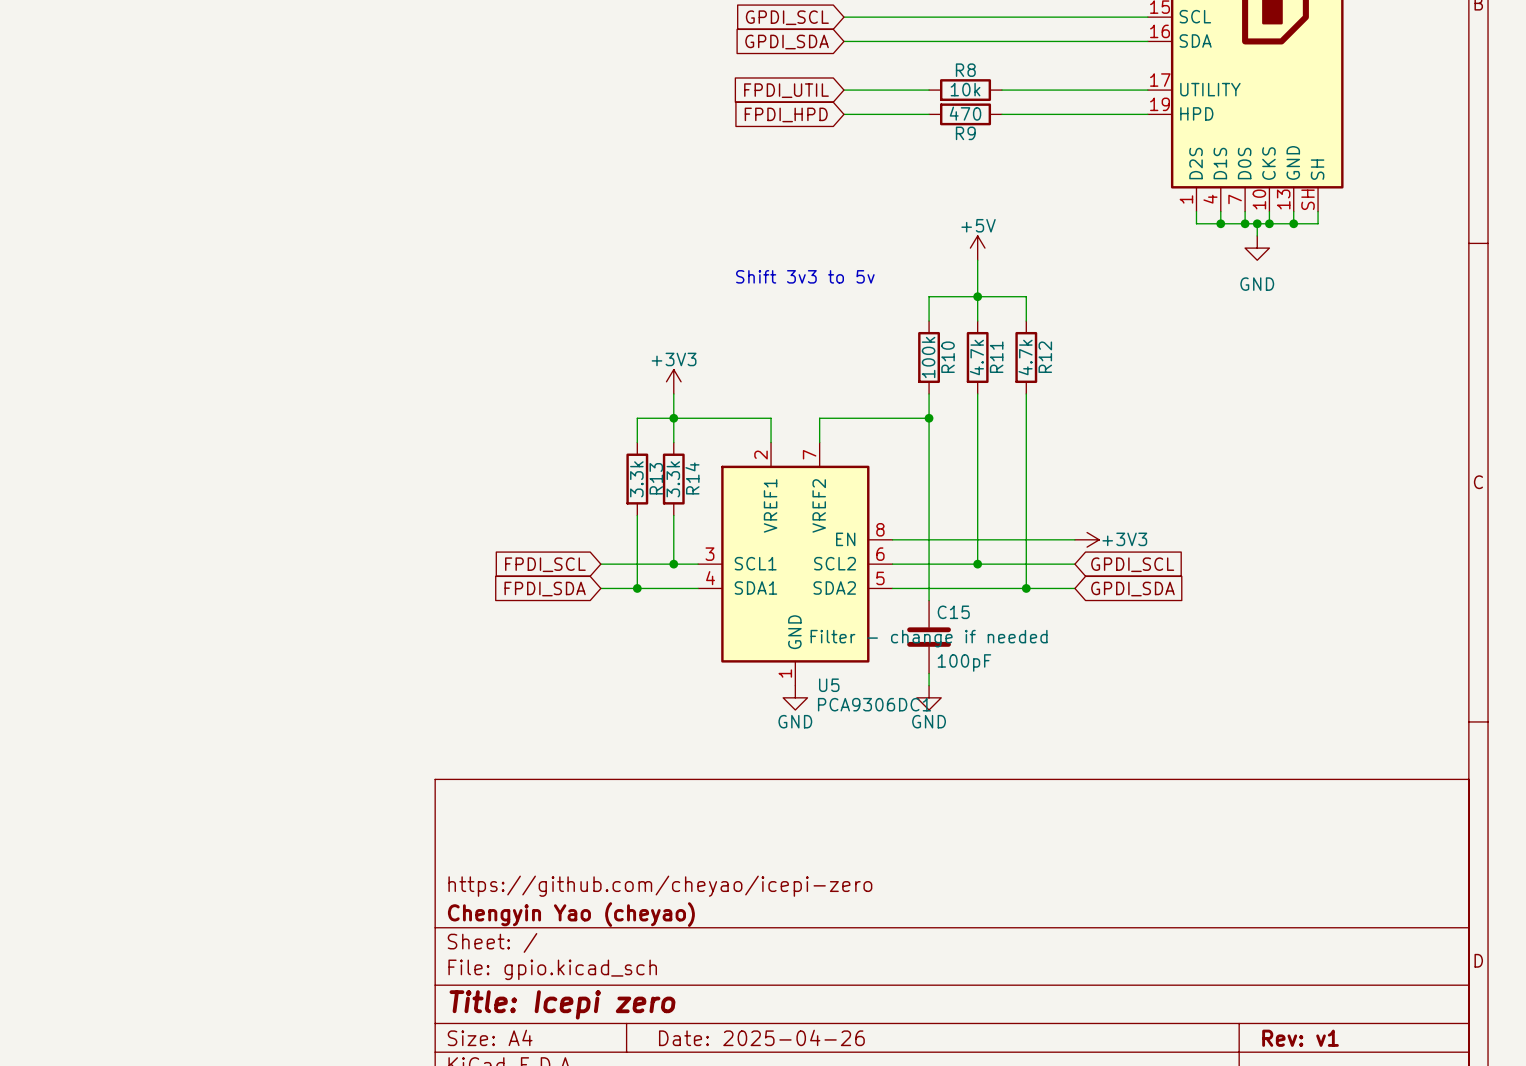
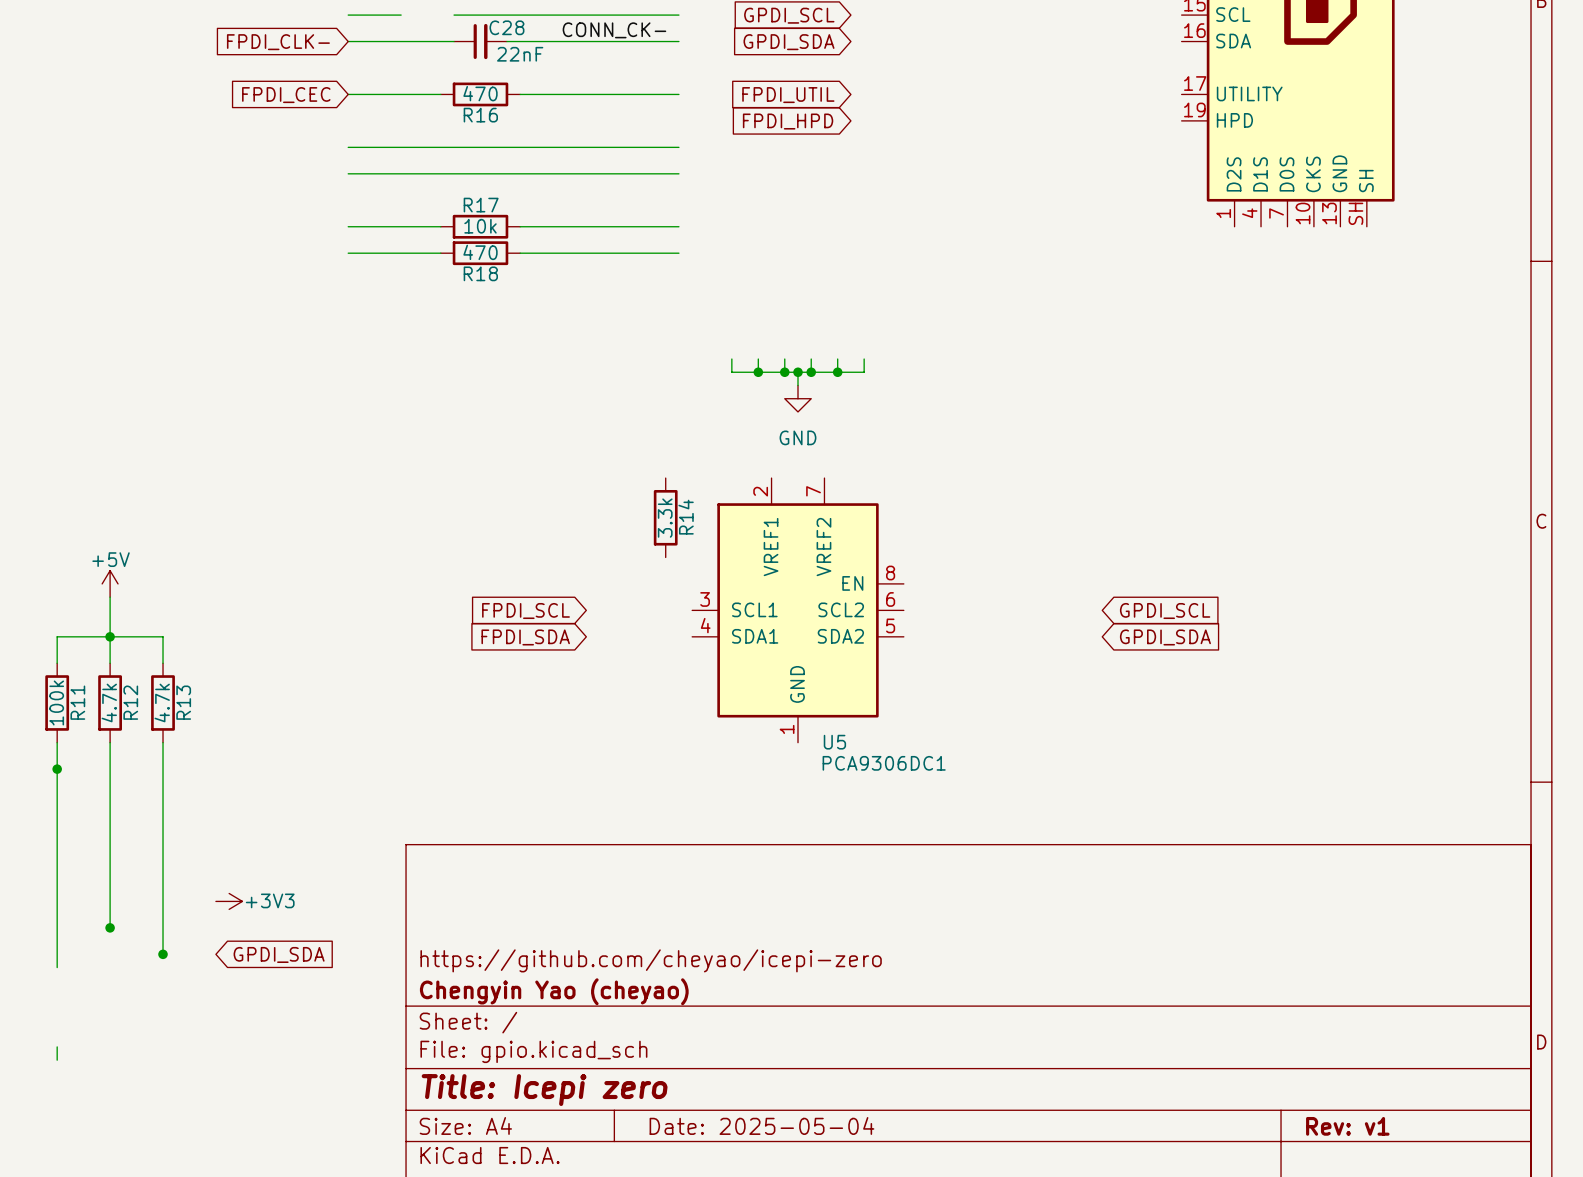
wire: none -> (348, 15) (401, 15)
wire: none -> (454, 15) (678, 15)
wire: (843, 17) (1147, 17) -> none
label: none -> CONN_CK- (614, 30)
wire: none -> (348, 41) (454, 41)
C28: none -> 22nF (480, 41)
wire: none -> (506, 41) (678, 41)
wire: (843, 41) (1147, 41) -> none
global label: none -> FPDI_CLK- (278, 42)
global label: none -> FPDI_CEC (286, 95)
wire: none -> (348, 94) (440, 94)
R16: none -> 470 (480, 94)
wire: none -> (520, 94) (678, 94)
wire: (843, 90) (929, 90) -> none
R8: 10k (965, 90) -> none
wire: (1001, 90) (1147, 90) -> none
wire: (843, 114) (929, 114) -> none
R9: 470 (965, 114) -> none
wire: (1001, 114) (1147, 114) -> none
wire: none -> (348, 147) (678, 147)
wire: none -> (348, 173) (678, 173)
wire: none -> (348, 226) (440, 226)
R17: none -> 10k (480, 226)
wire: none -> (520, 226) (678, 226)
wire: (1196, 211) (1196, 223) (1318, 223) (1318, 211) -> none
wire: (1220, 211) (1220, 223) -> none
wire: (1245, 211) (1245, 223) -> none
wire: (1269, 211) (1269, 223) -> none
wire: (1293, 211) (1293, 223) -> none
junction: (1220, 223) -> none
junction: (1245, 223) -> none
wire: (1257, 223) (1257, 235) -> none
junction: (1257, 223) -> none
junction: (1269, 223) -> none
junction: (1293, 223) -> none
wire: none -> (348, 253) (440, 253)
R18: none -> 470 (480, 253)
wire: none -> (520, 253) (678, 253)
power symbol: +5V (977, 248) -> none
power symbol: GND (1257, 248) -> none
wire: (977, 260) (977, 321) -> none
text: Shift 3v3 to 5v (805, 276) -> none
junction: (977, 296) -> none
wire: (929, 321) (929, 296) (1026, 296) (1026, 321) -> none
wire: none -> (731, 359) (731, 372) (864, 372) (864, 359)
wire: none -> (758, 359) (758, 372)
wire: none -> (784, 359) (784, 372)
wire: none -> (811, 359) (811, 372)
wire: none -> (837, 359) (837, 372)
junction: none -> (758, 372)
junction: none -> (784, 372)
wire: none -> (798, 372) (798, 385)
junction: none -> (798, 372)
junction: none -> (811, 372)
junction: none -> (837, 372)
R10: 100k (929, 357) -> none
R11 value: 4.7k (976, 357) -> 100k (56, 702)
R11 position: (977, 357) -> (57, 702)
R12 position: (1026, 357) -> (110, 702)
power symbol: none -> GND (798, 398)
power symbol: +3V3 (673, 381) -> none
wire: (673, 393) (673, 442) -> none
wire: (929, 393) (929, 600) -> none
wire: (977, 393) (977, 564) -> none
wire: (1026, 393) (1026, 588) -> none
junction: (673, 418) -> none
wire: (929, 418) (819, 418) (819, 442) -> none
junction: (929, 418) -> none
wire: (637, 442) (637, 418) (771, 418) (771, 442) -> none
R13 value: 3.3k (636, 479) -> 4.7k (162, 702)
R13 position: (637, 479) -> (163, 702)
wire: (637, 515) (637, 588) -> none
wire: (673, 515) (673, 564) -> none
power symbol: none -> +5V (110, 583)
wire: (892, 539) (1074, 539) -> none
power symbol: +3V3 (1087, 539) -> none
wire: none -> (110, 597) (110, 663)
wire: (600, 564) (698, 564) -> none
junction: (673, 564) -> none
wire: (892, 564) (1074, 564) -> none
junction: (977, 564) -> none
junction: none -> (110, 636)
wire: (600, 588) (698, 588) -> none
junction: (637, 588) -> none
wire: (892, 588) (1074, 588) -> none
junction: (1026, 588) -> none
wire: none -> (57, 663) (57, 636) (163, 636) (163, 663)
C15: 100pF (929, 637) -> none
wire: (929, 673) (929, 685) -> none
wire: none -> (57, 742) (57, 967)
wire: none -> (110, 742) (110, 927)
wire: none -> (163, 742) (163, 954)
power symbol: GND (795, 697) -> none
power symbol: GND (929, 697) -> none
junction: none -> (57, 769)
power symbol: none -> +3V3 (229, 901)
junction: none -> (110, 927)
junction: none -> (163, 954)
global label: none -> GPDI_SDA (279, 954)
wire: none -> (57, 1046) (57, 1060)
title block: Date: 2025-04-26 (761, 1037) -> Date: 2025-05-04 (761, 1125)

